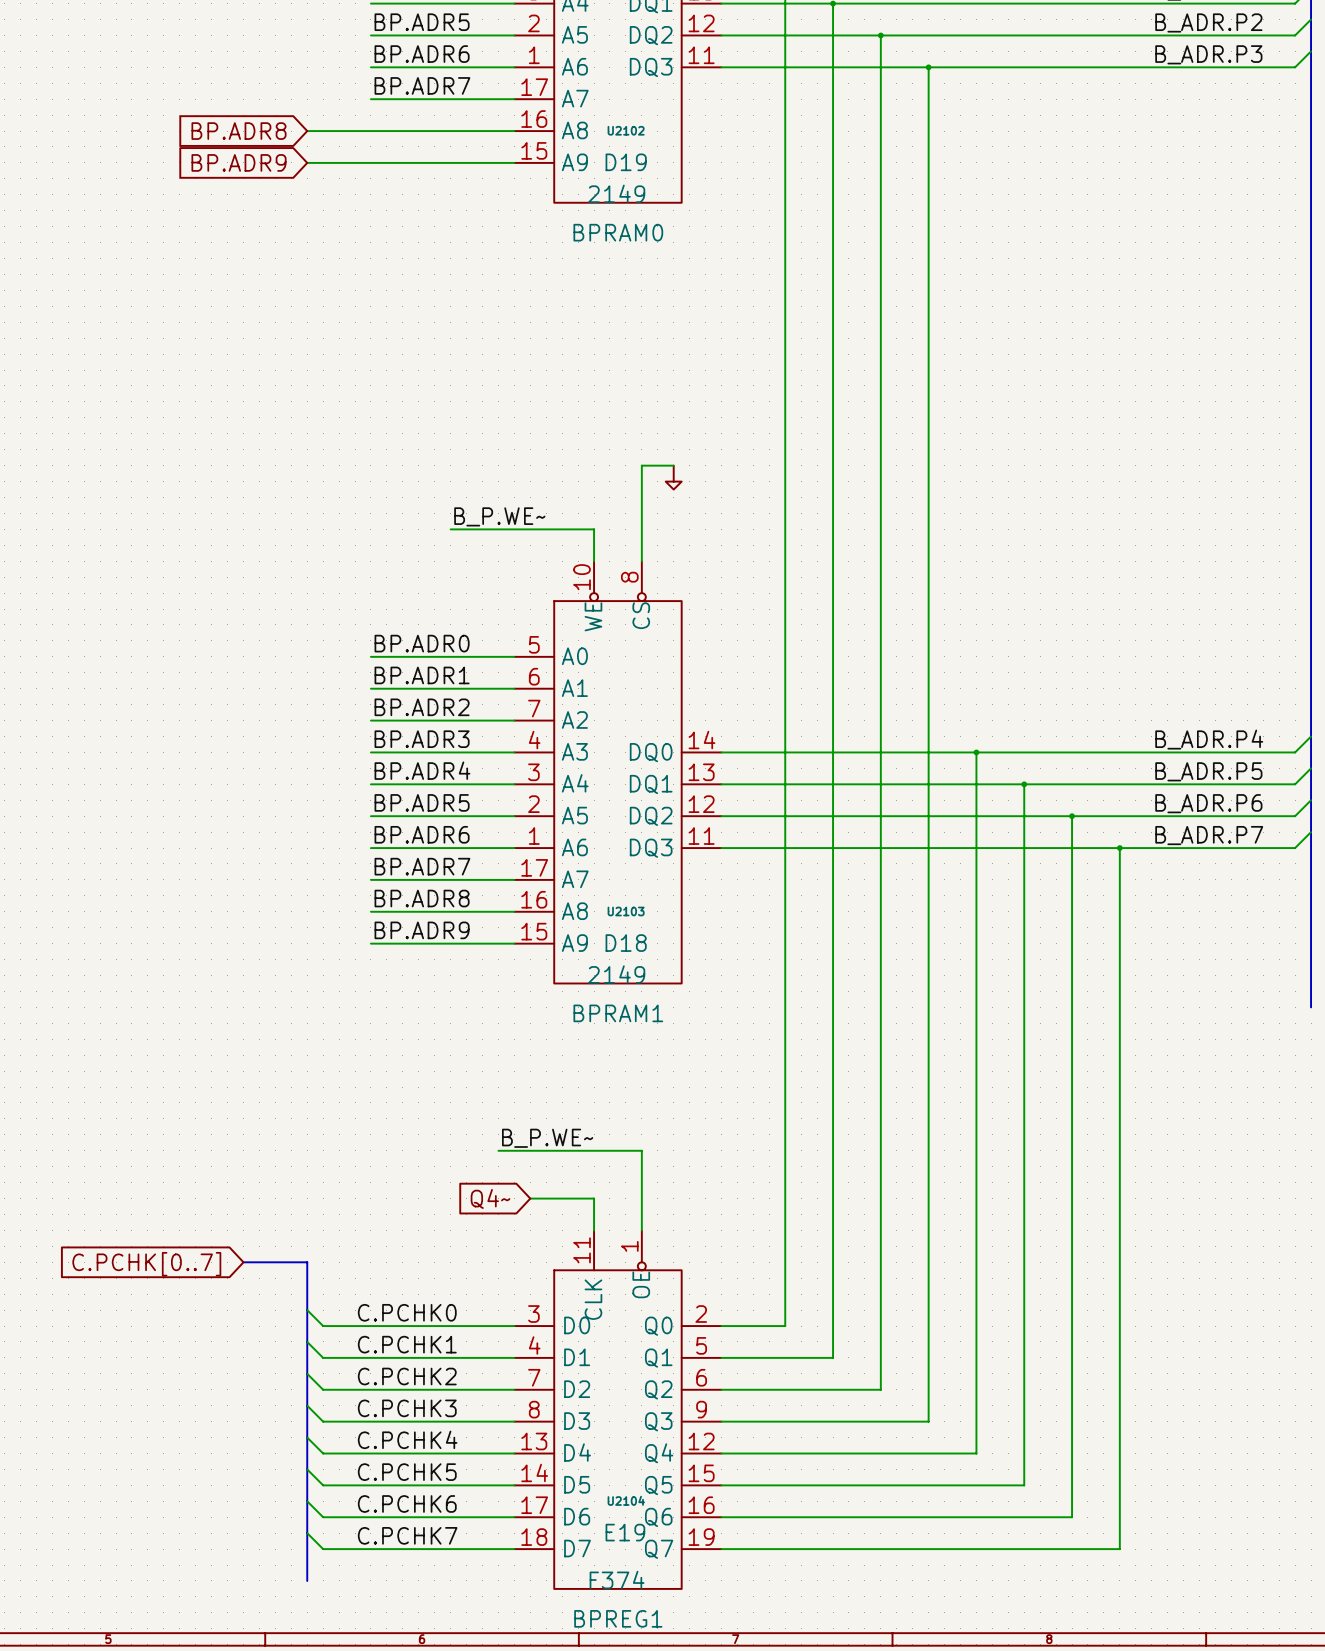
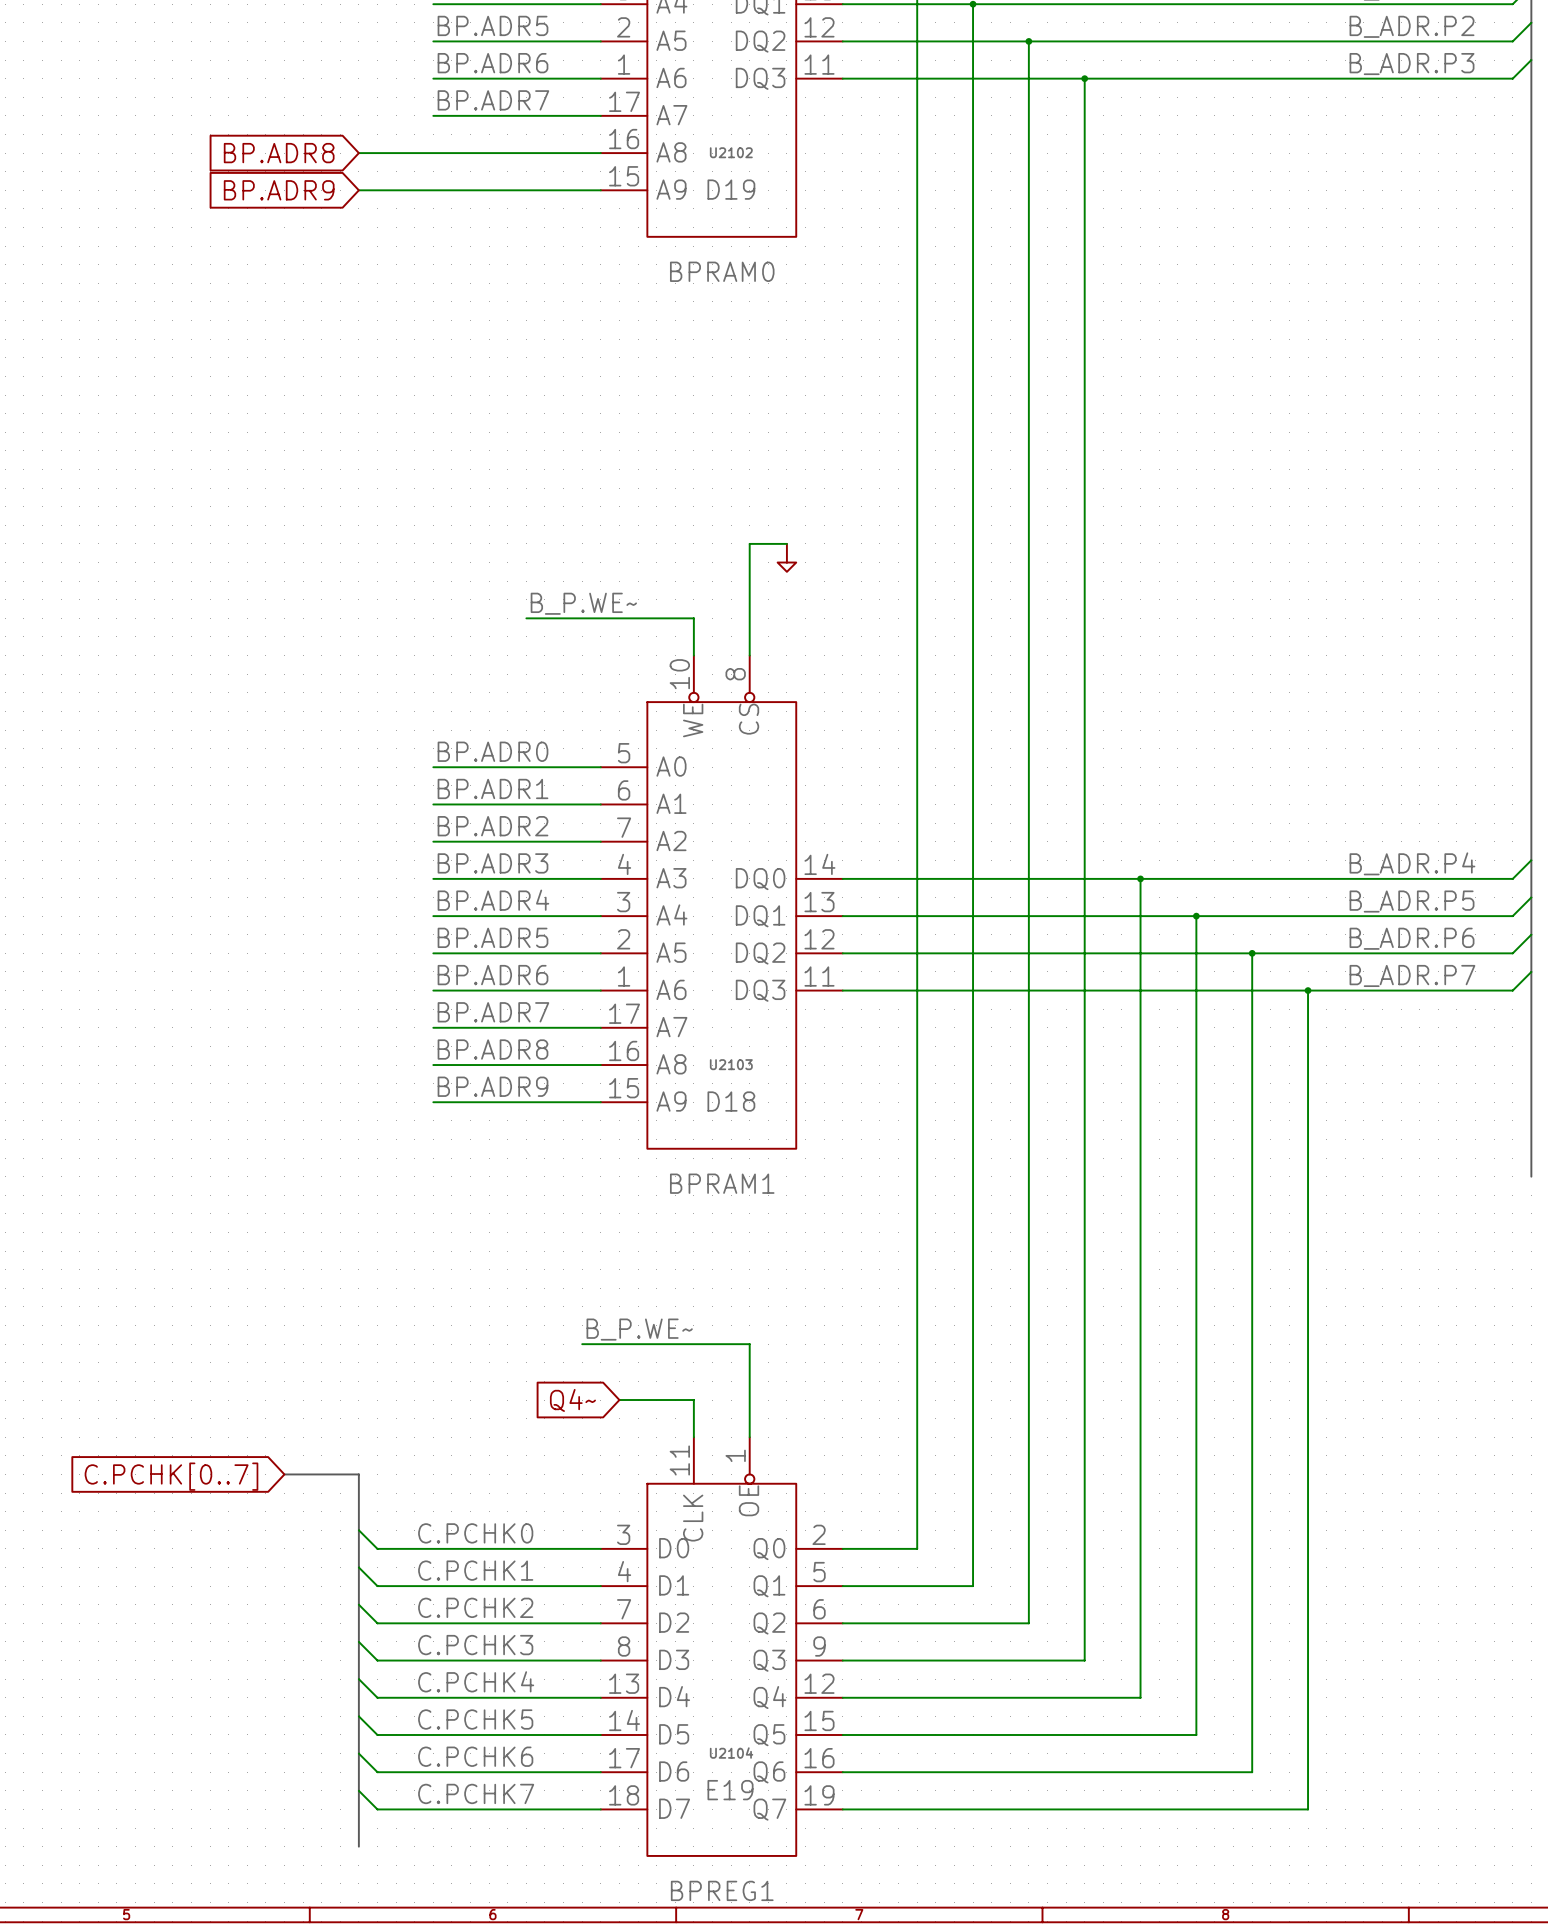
U2102 value: 2149 (616, 193) -> none
U2103 value: 2149 (616, 974) -> none
U2104 value: F374 (617, 1580) -> none

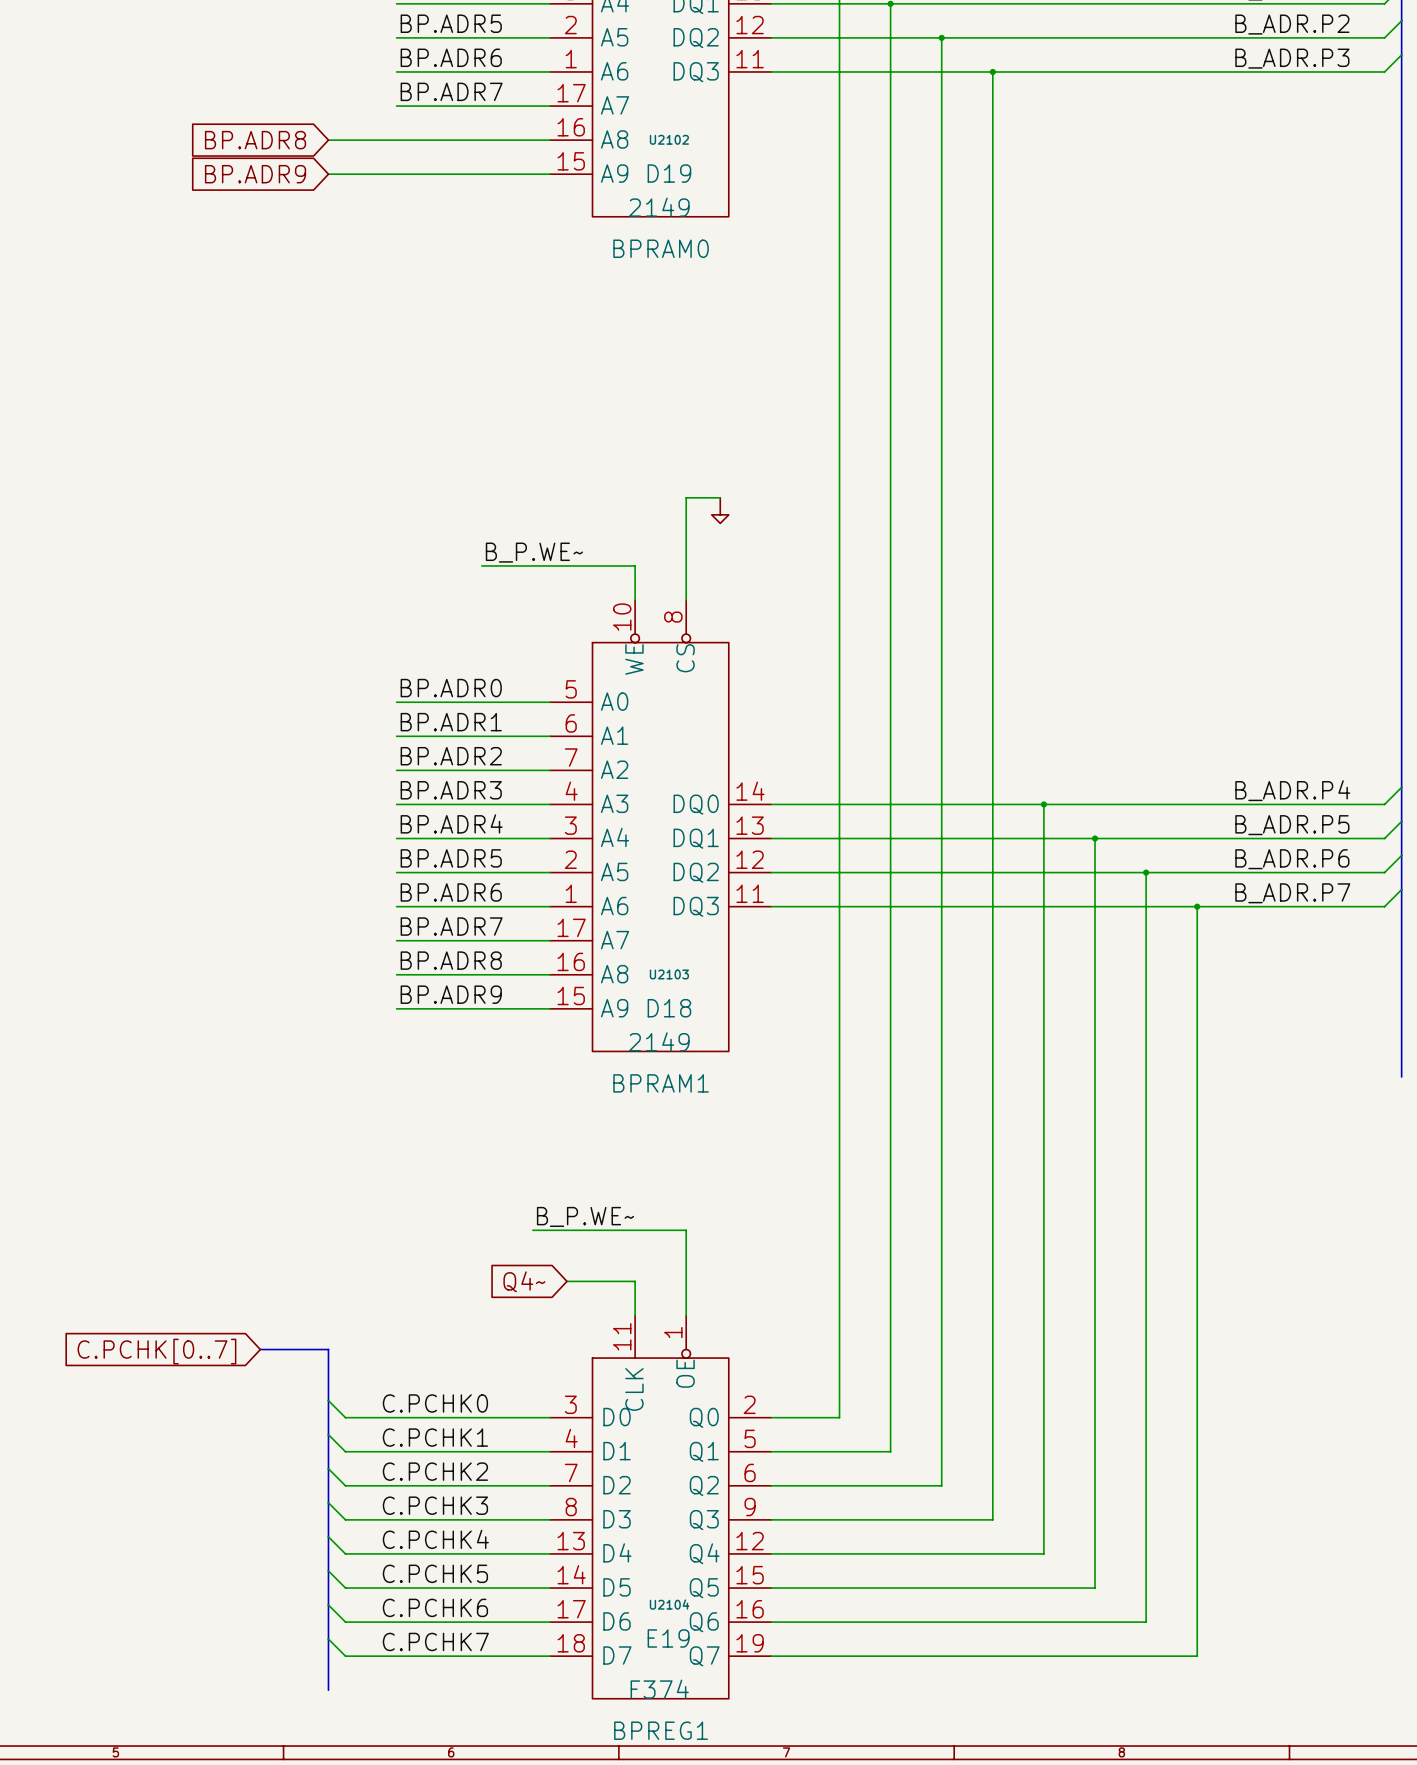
U2102 value: none -> 2149 (659, 207)
U2103 value: none -> 2149 (659, 1041)
U2104 value: none -> F374 (659, 1689)

